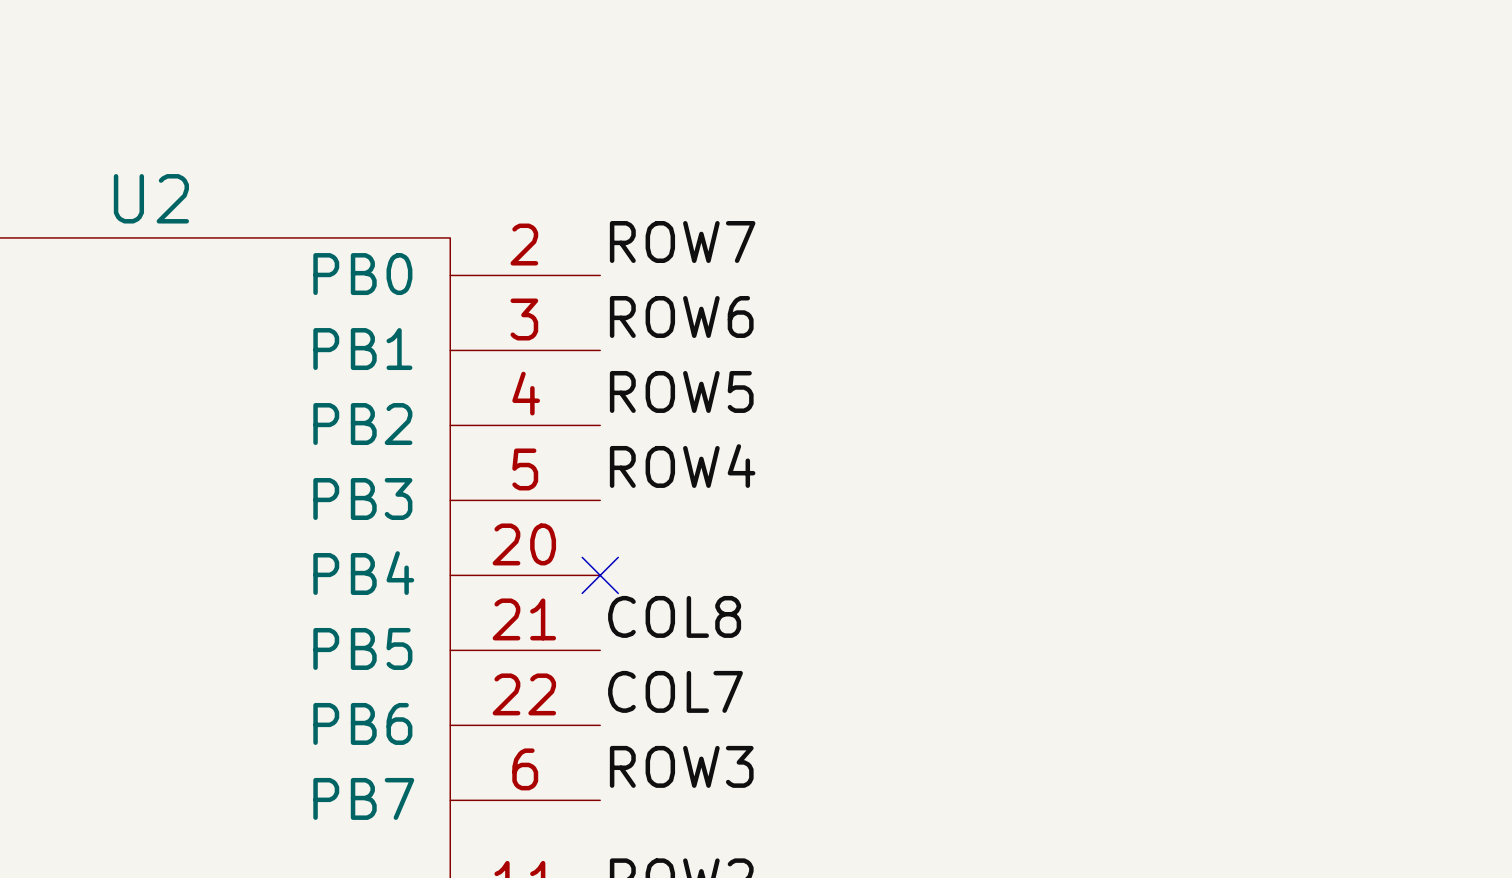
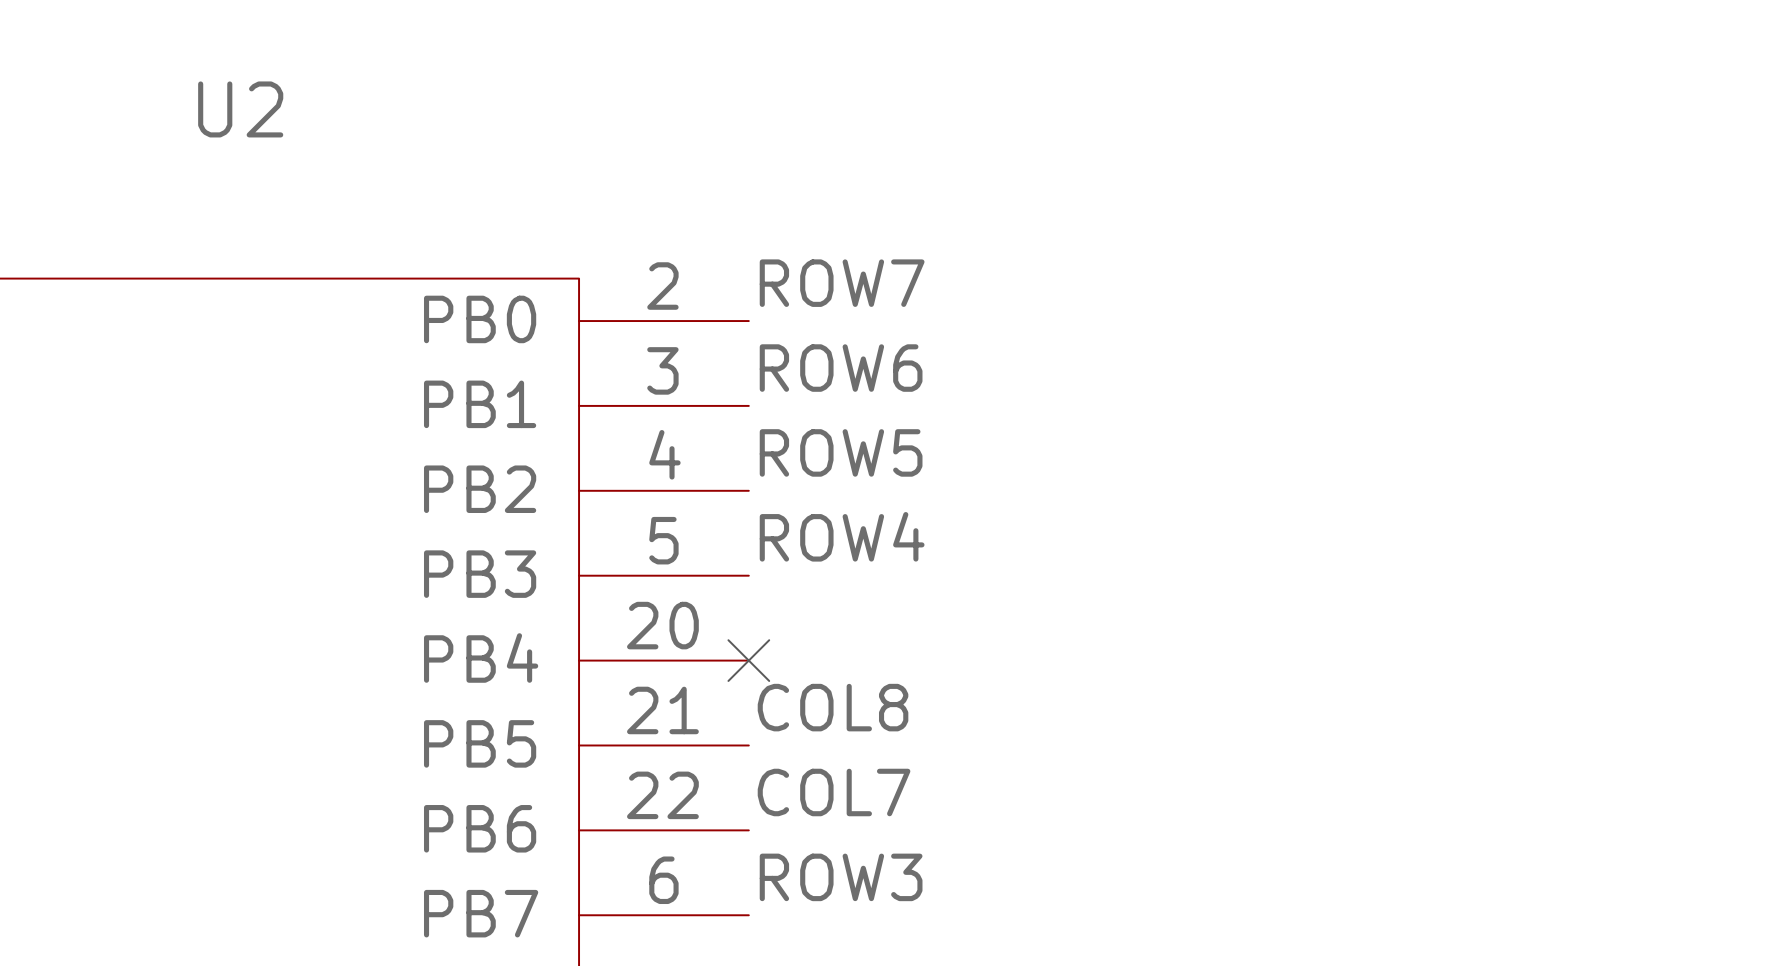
U2 name position: U2 (151, 198) -> U2 (240, 109)

